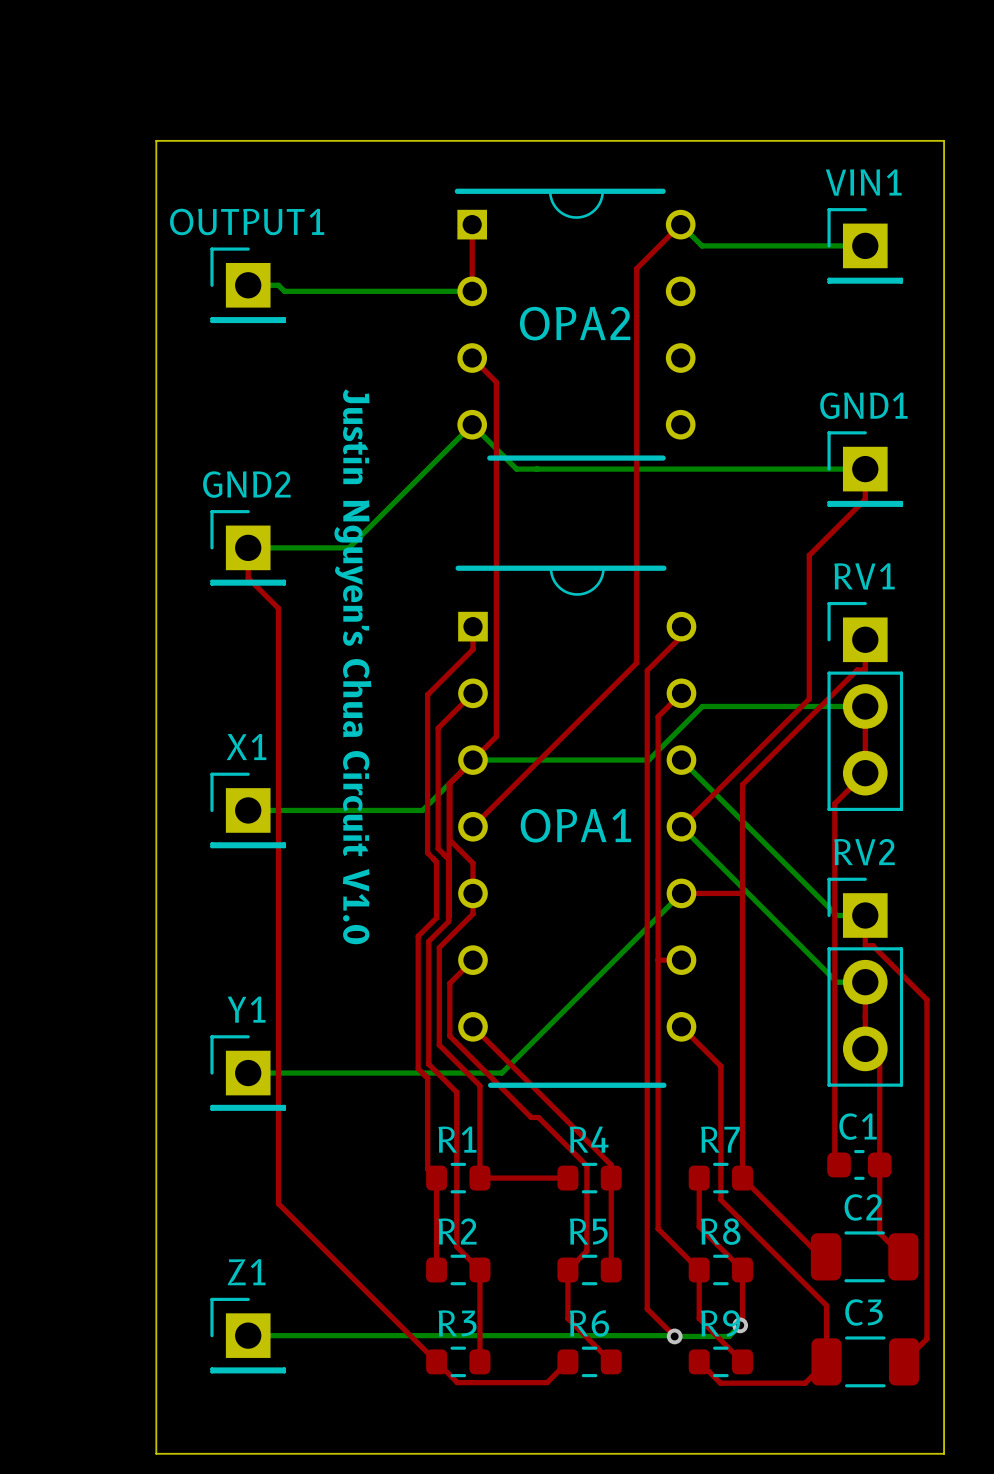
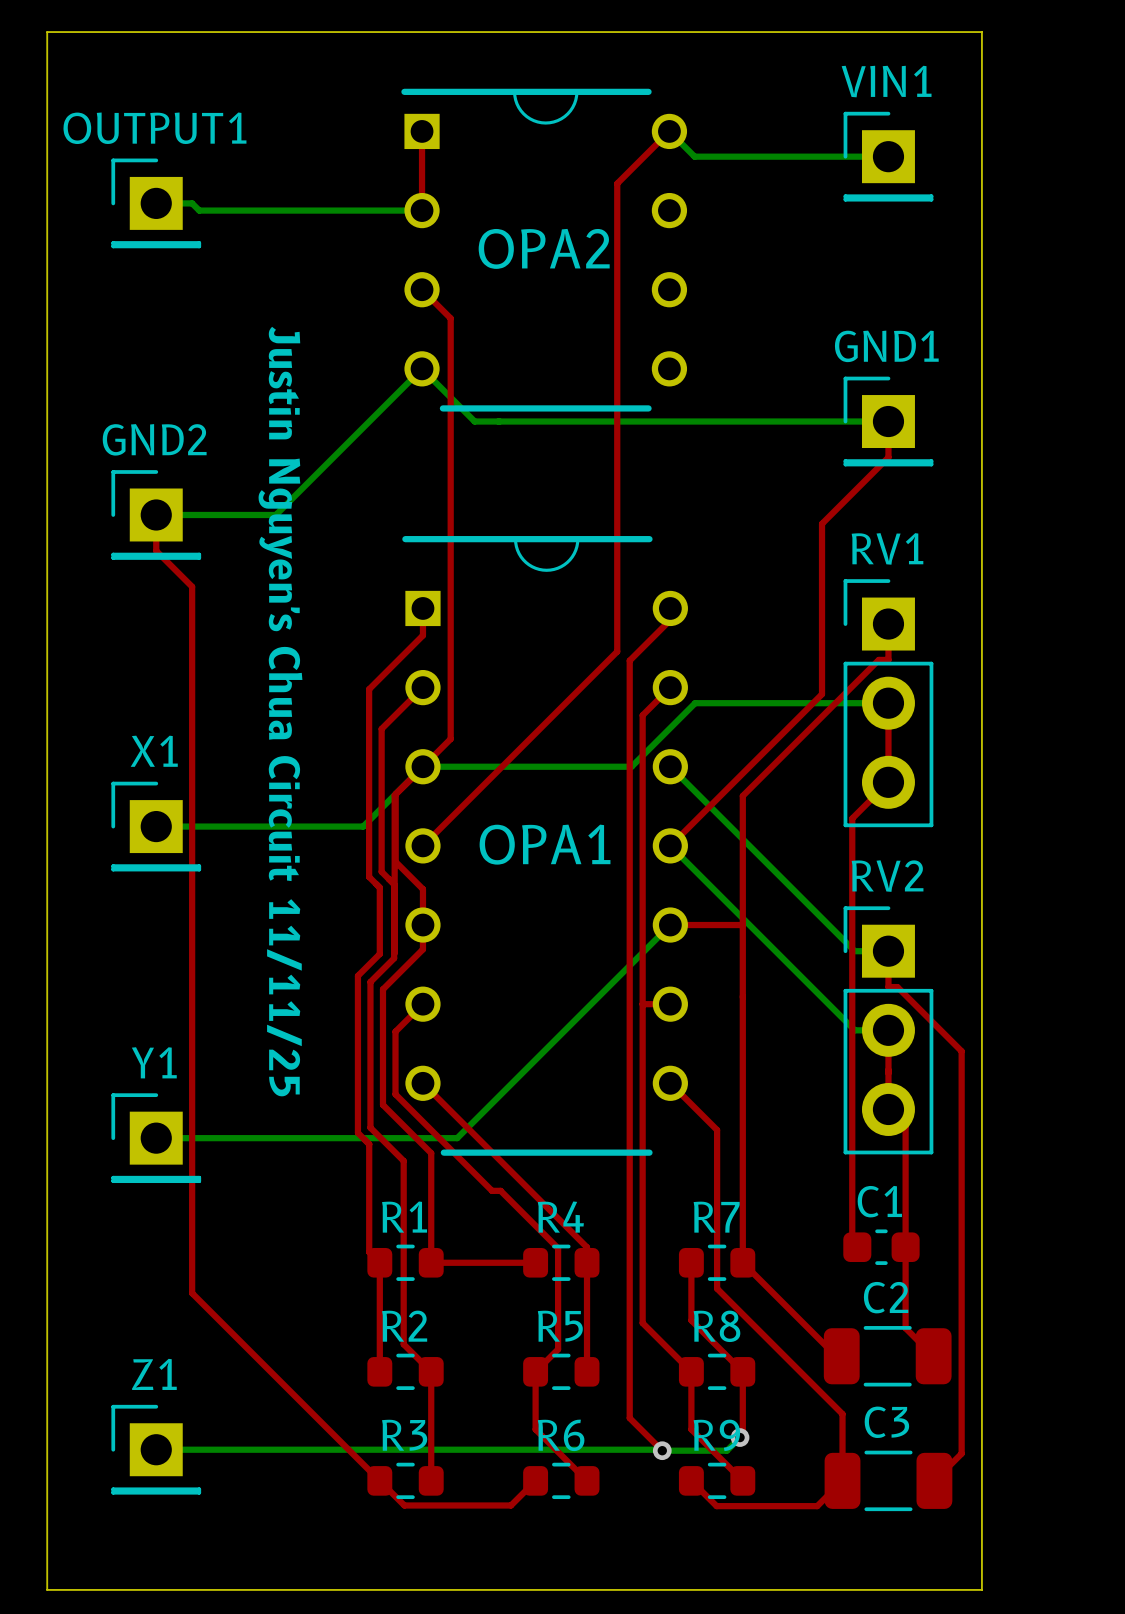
text: Justin Nguyen's Chua Circuit V1.0 (352, 666) -> Justin Nguyen's Chua Circuit 11/11/25 (280, 711)

